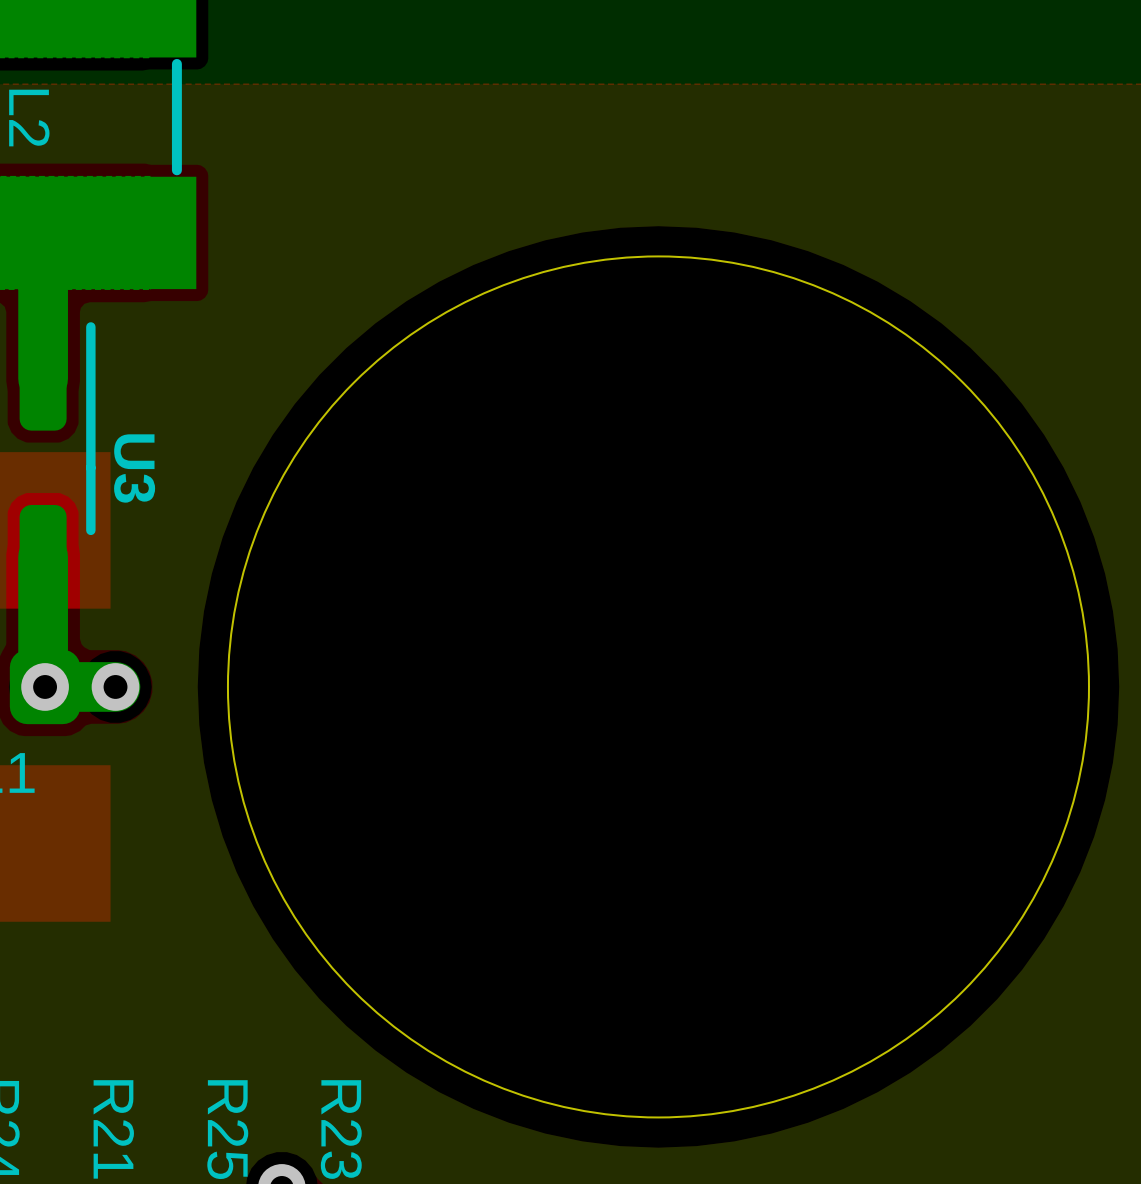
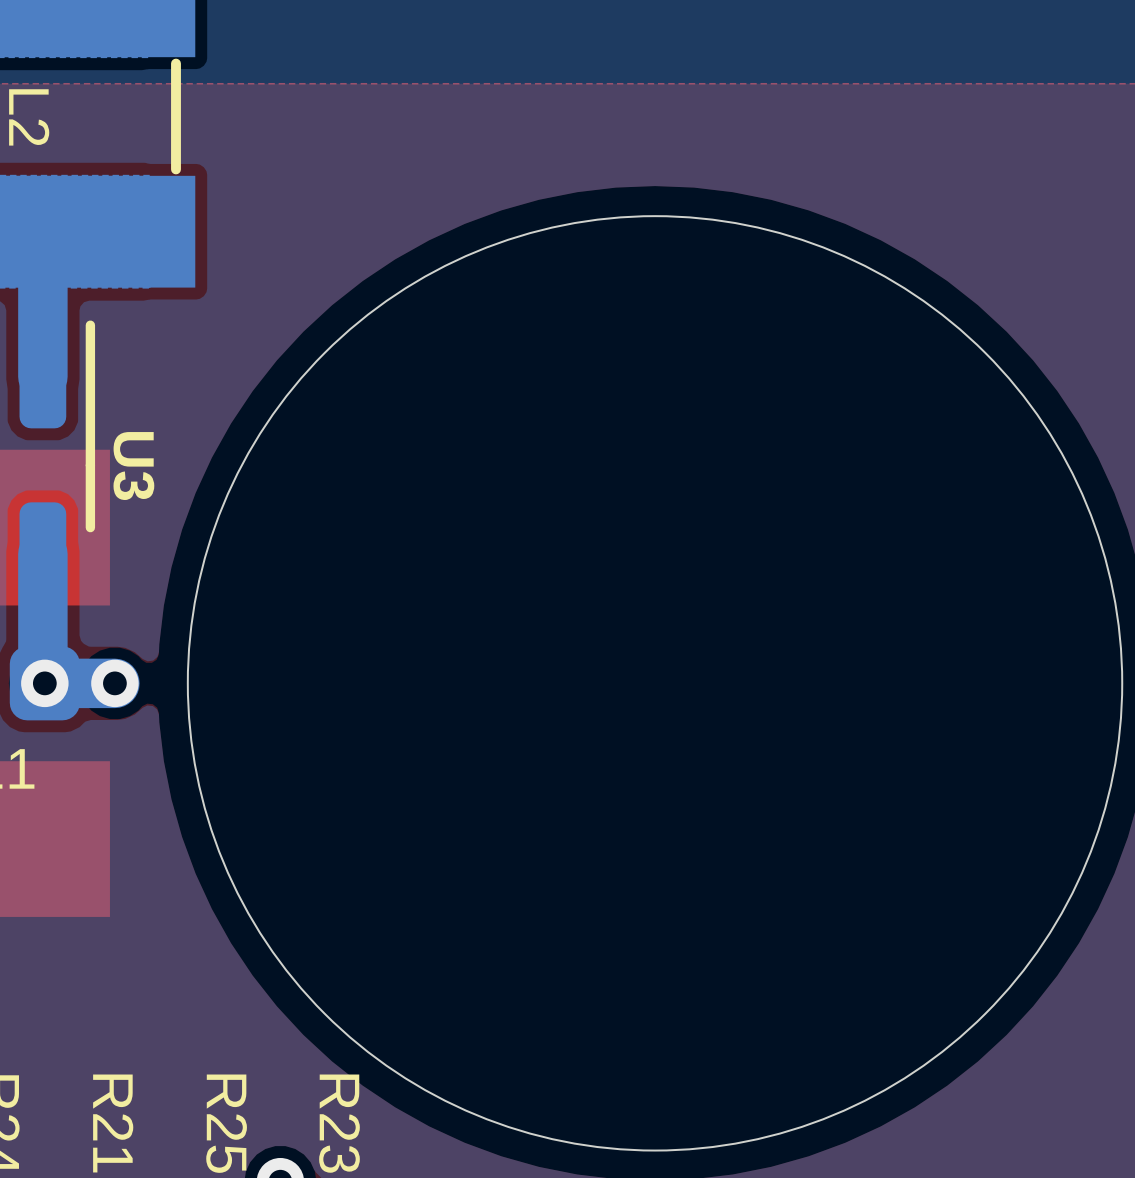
round board edge size: [226, 255, 1090, 1119] -> [186, 215, 1124, 1152]

